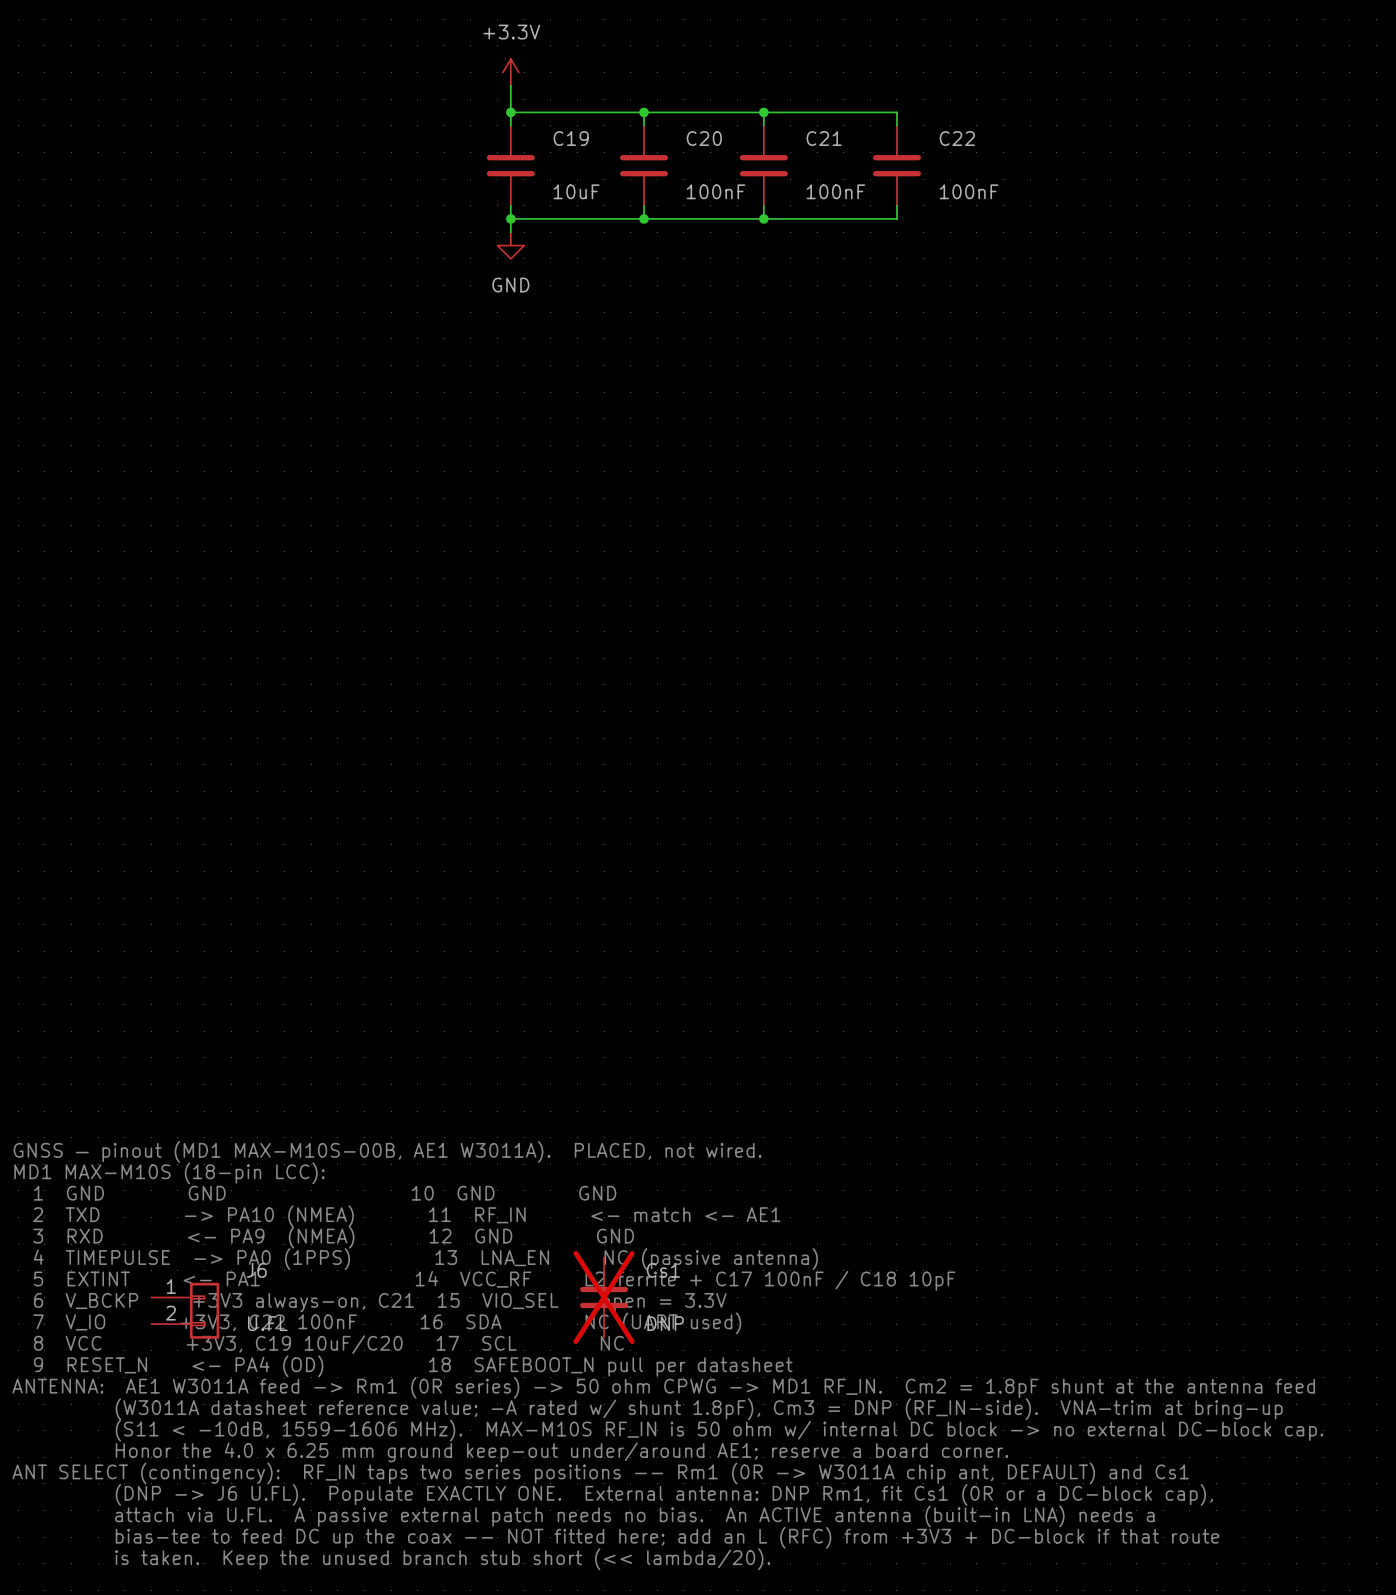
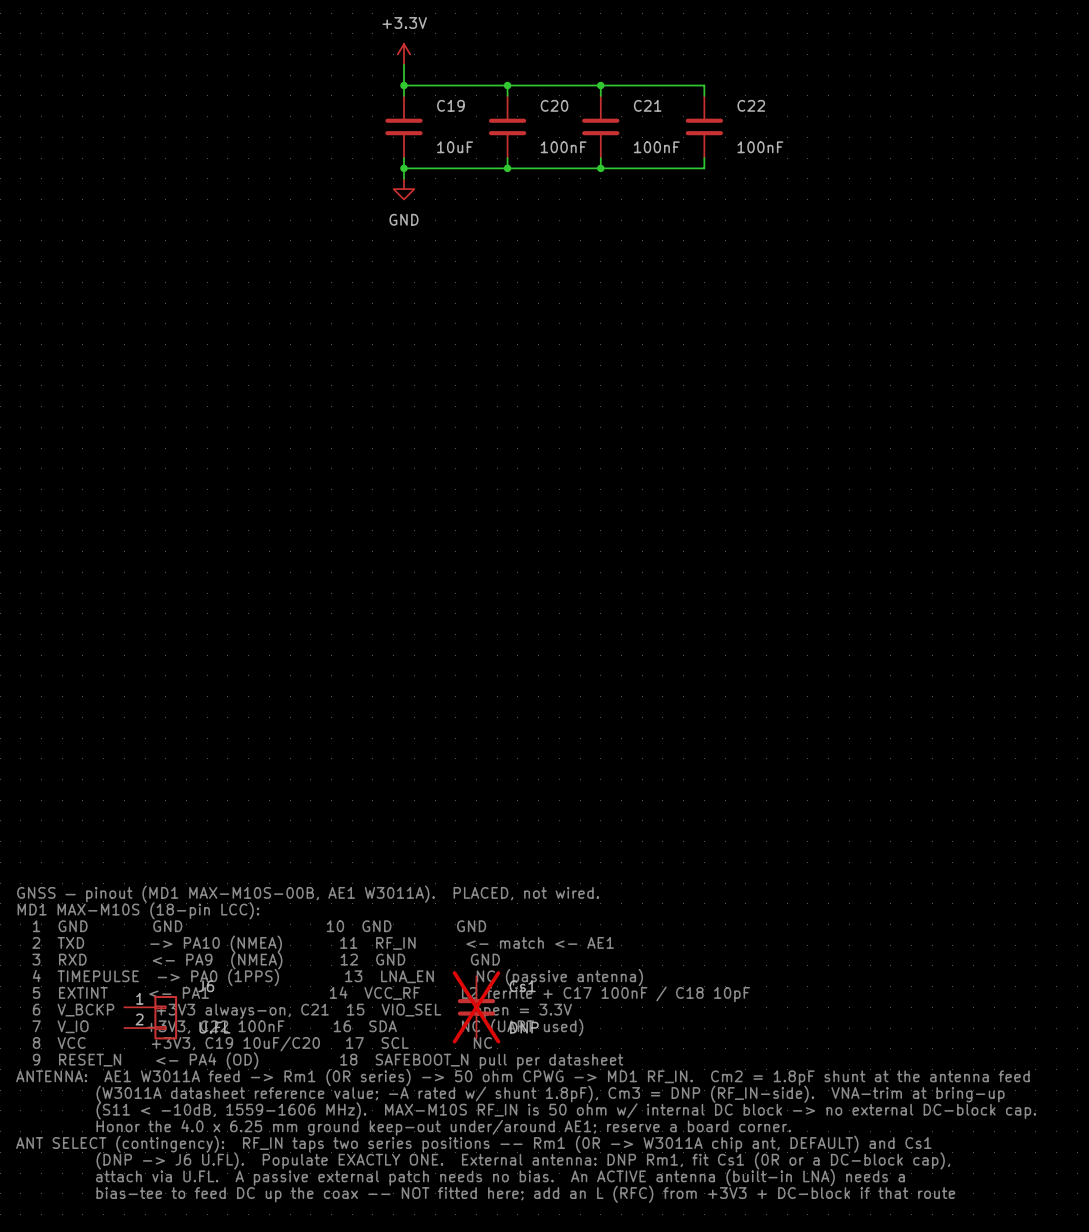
text: is taken. Keep the unused branch stub short (<< lambda/20). (442, 1559) -> none

